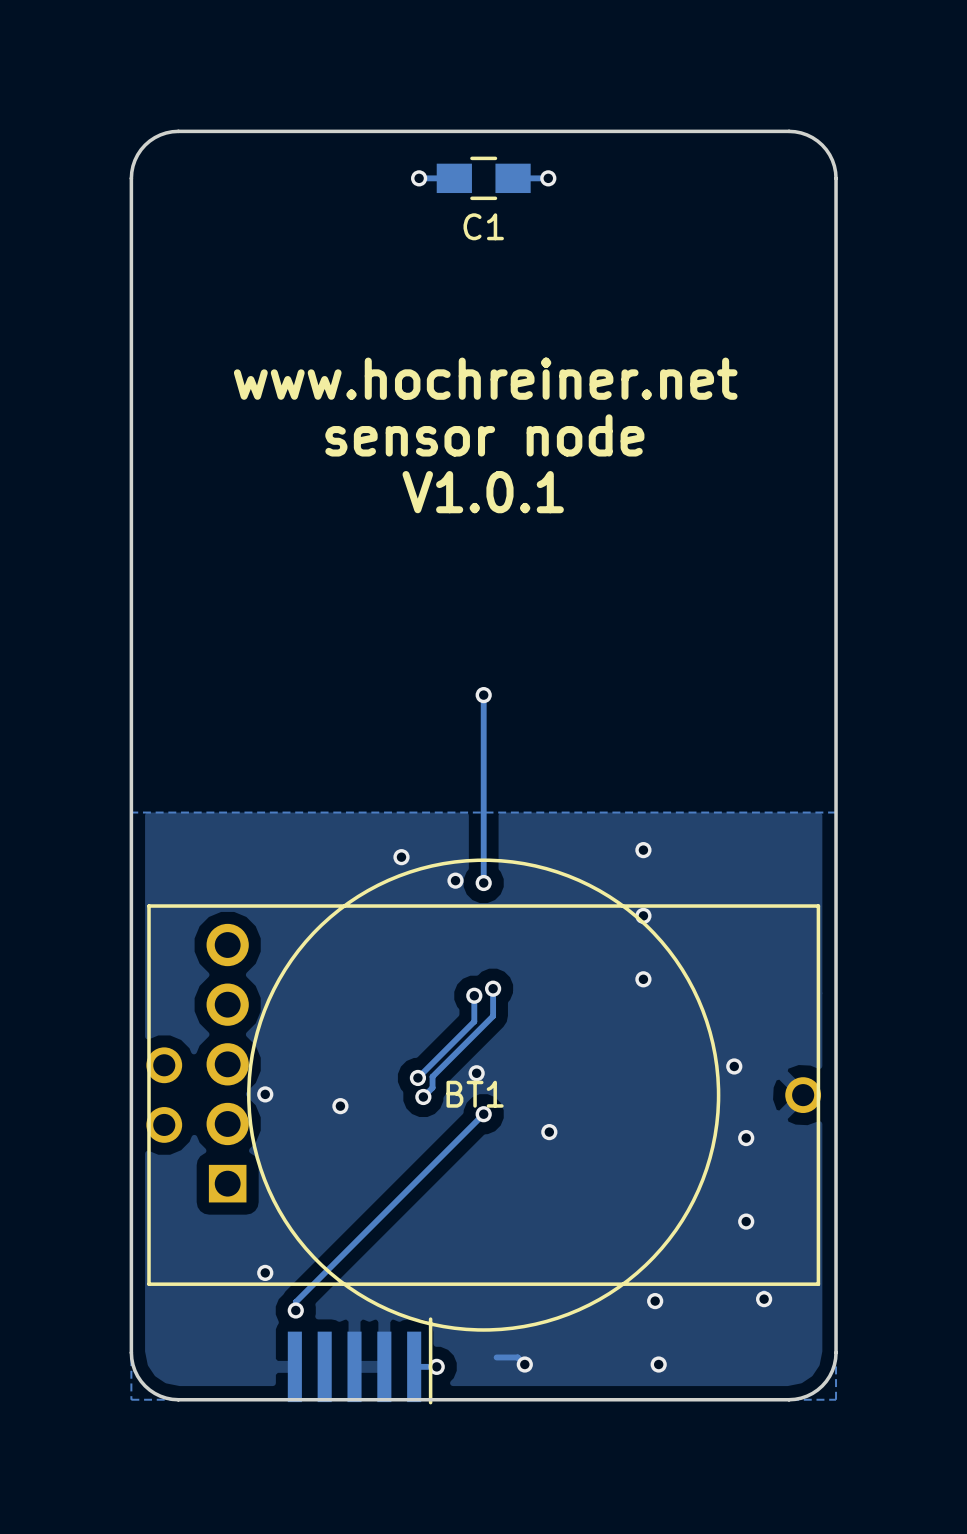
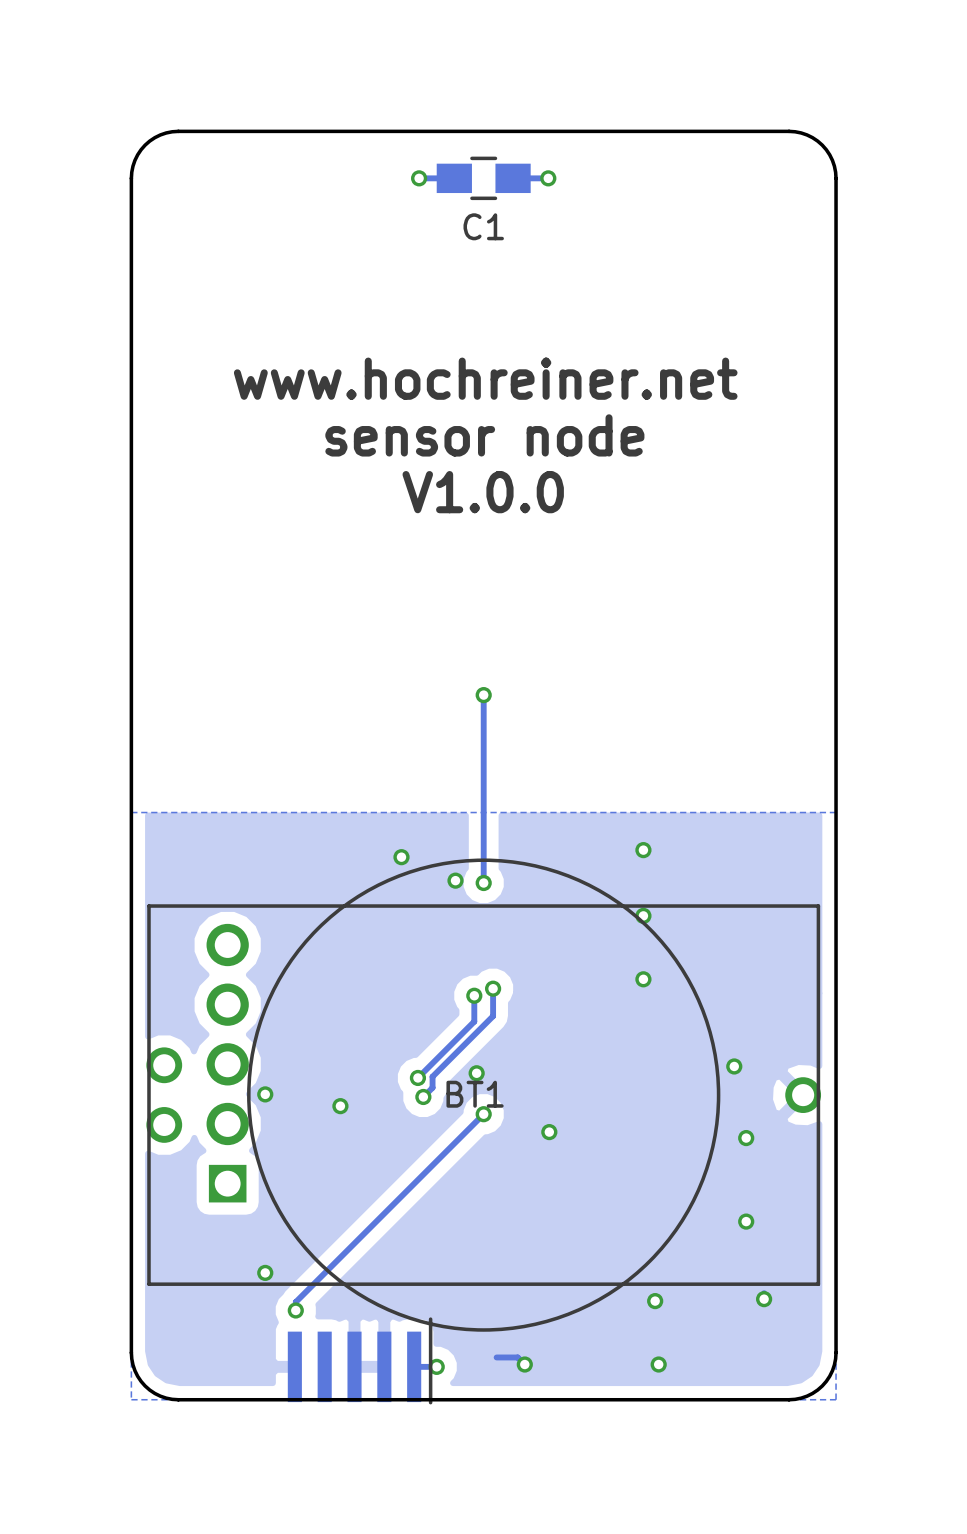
text: V1.0.1 (483, 492) -> V1.0.0 (483, 492)

